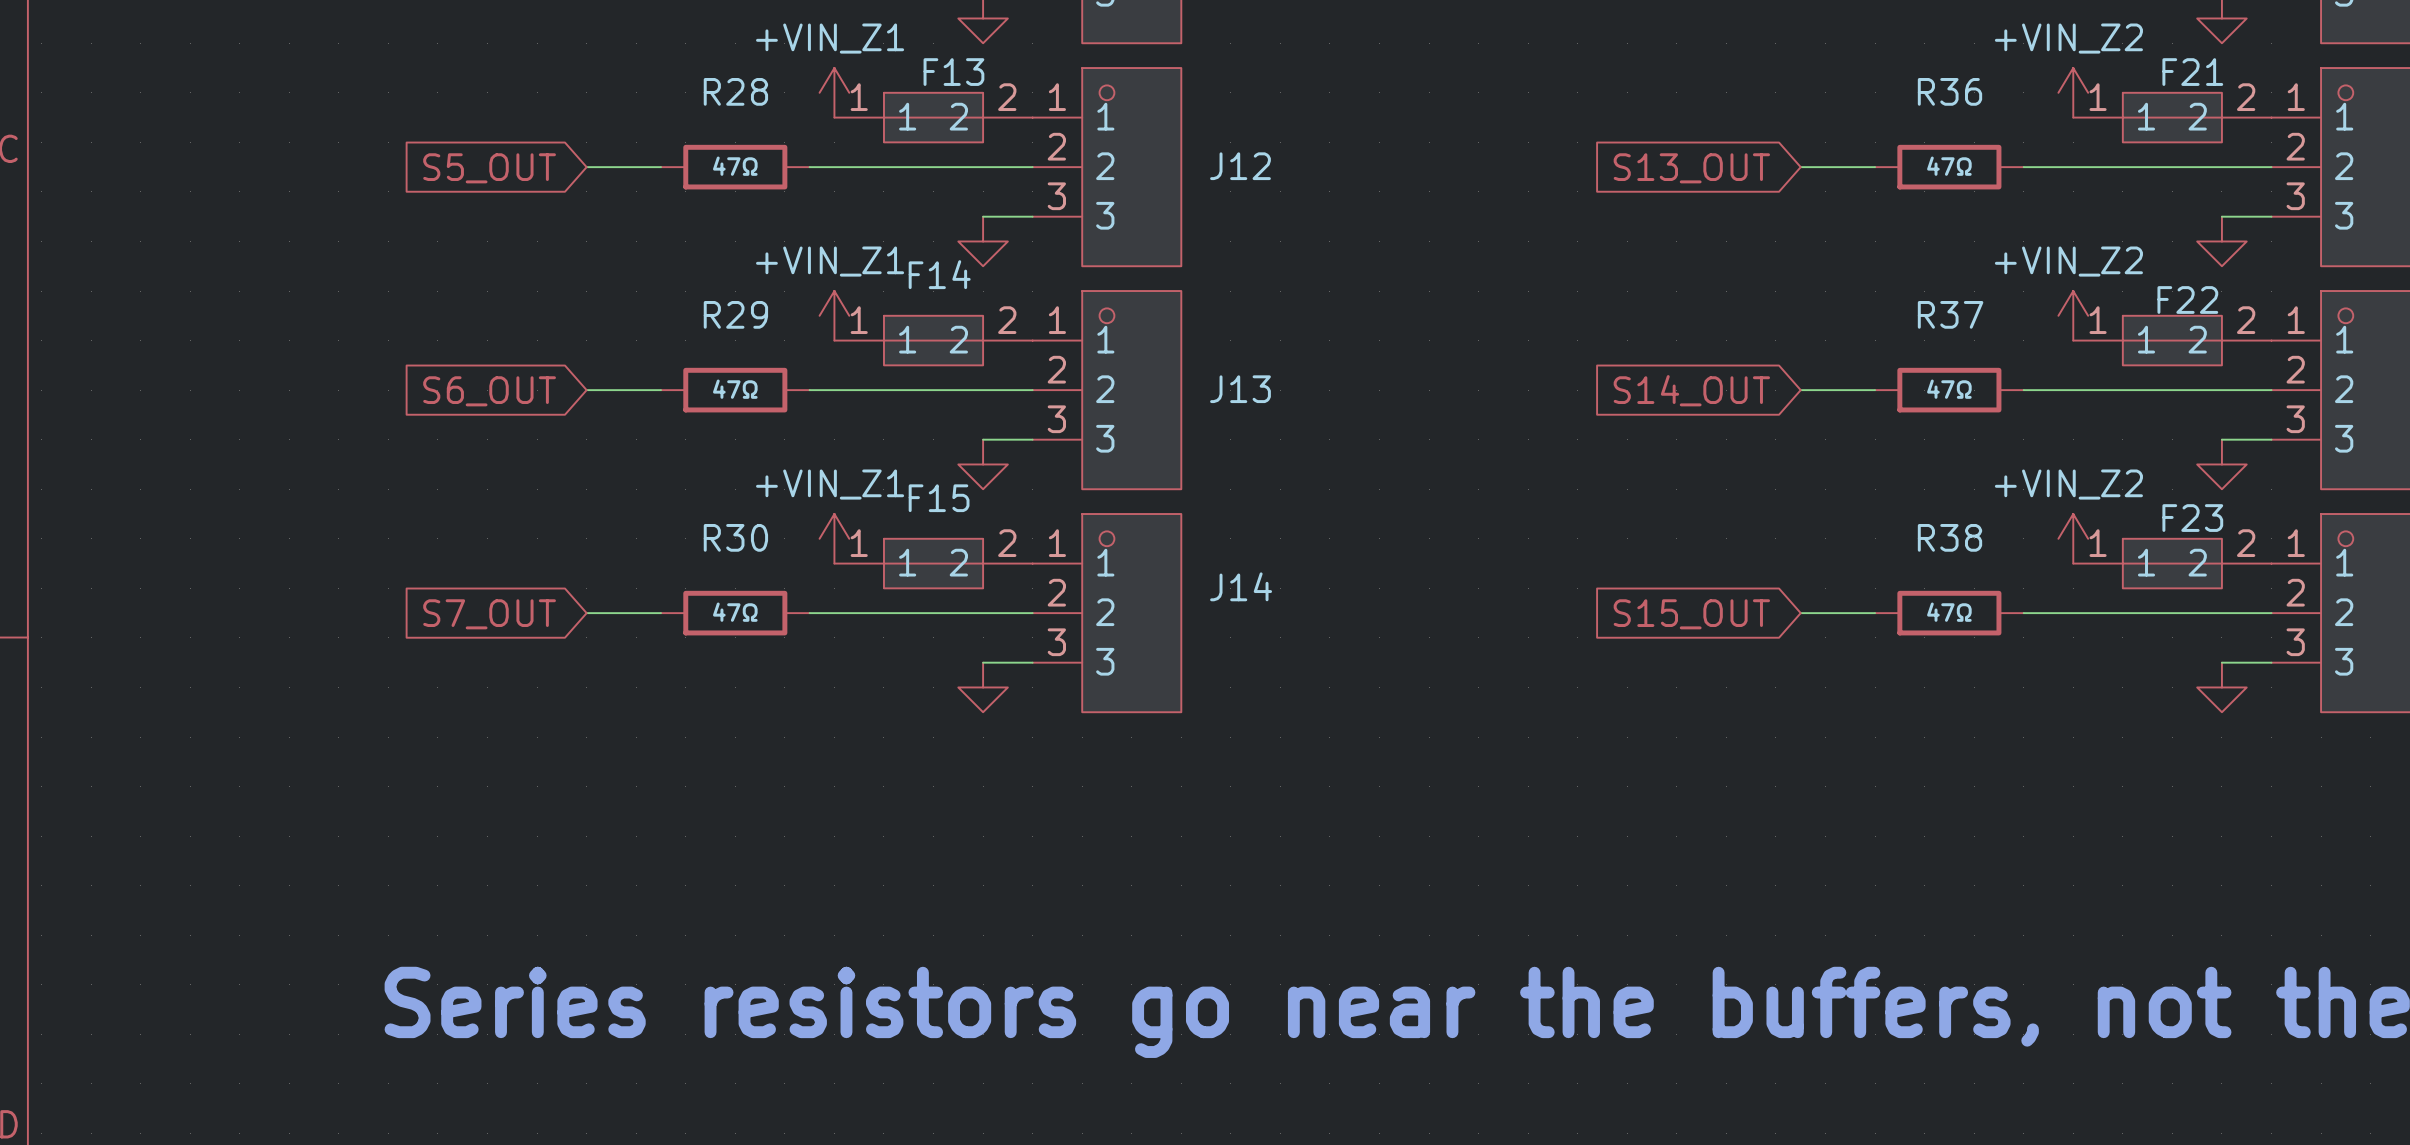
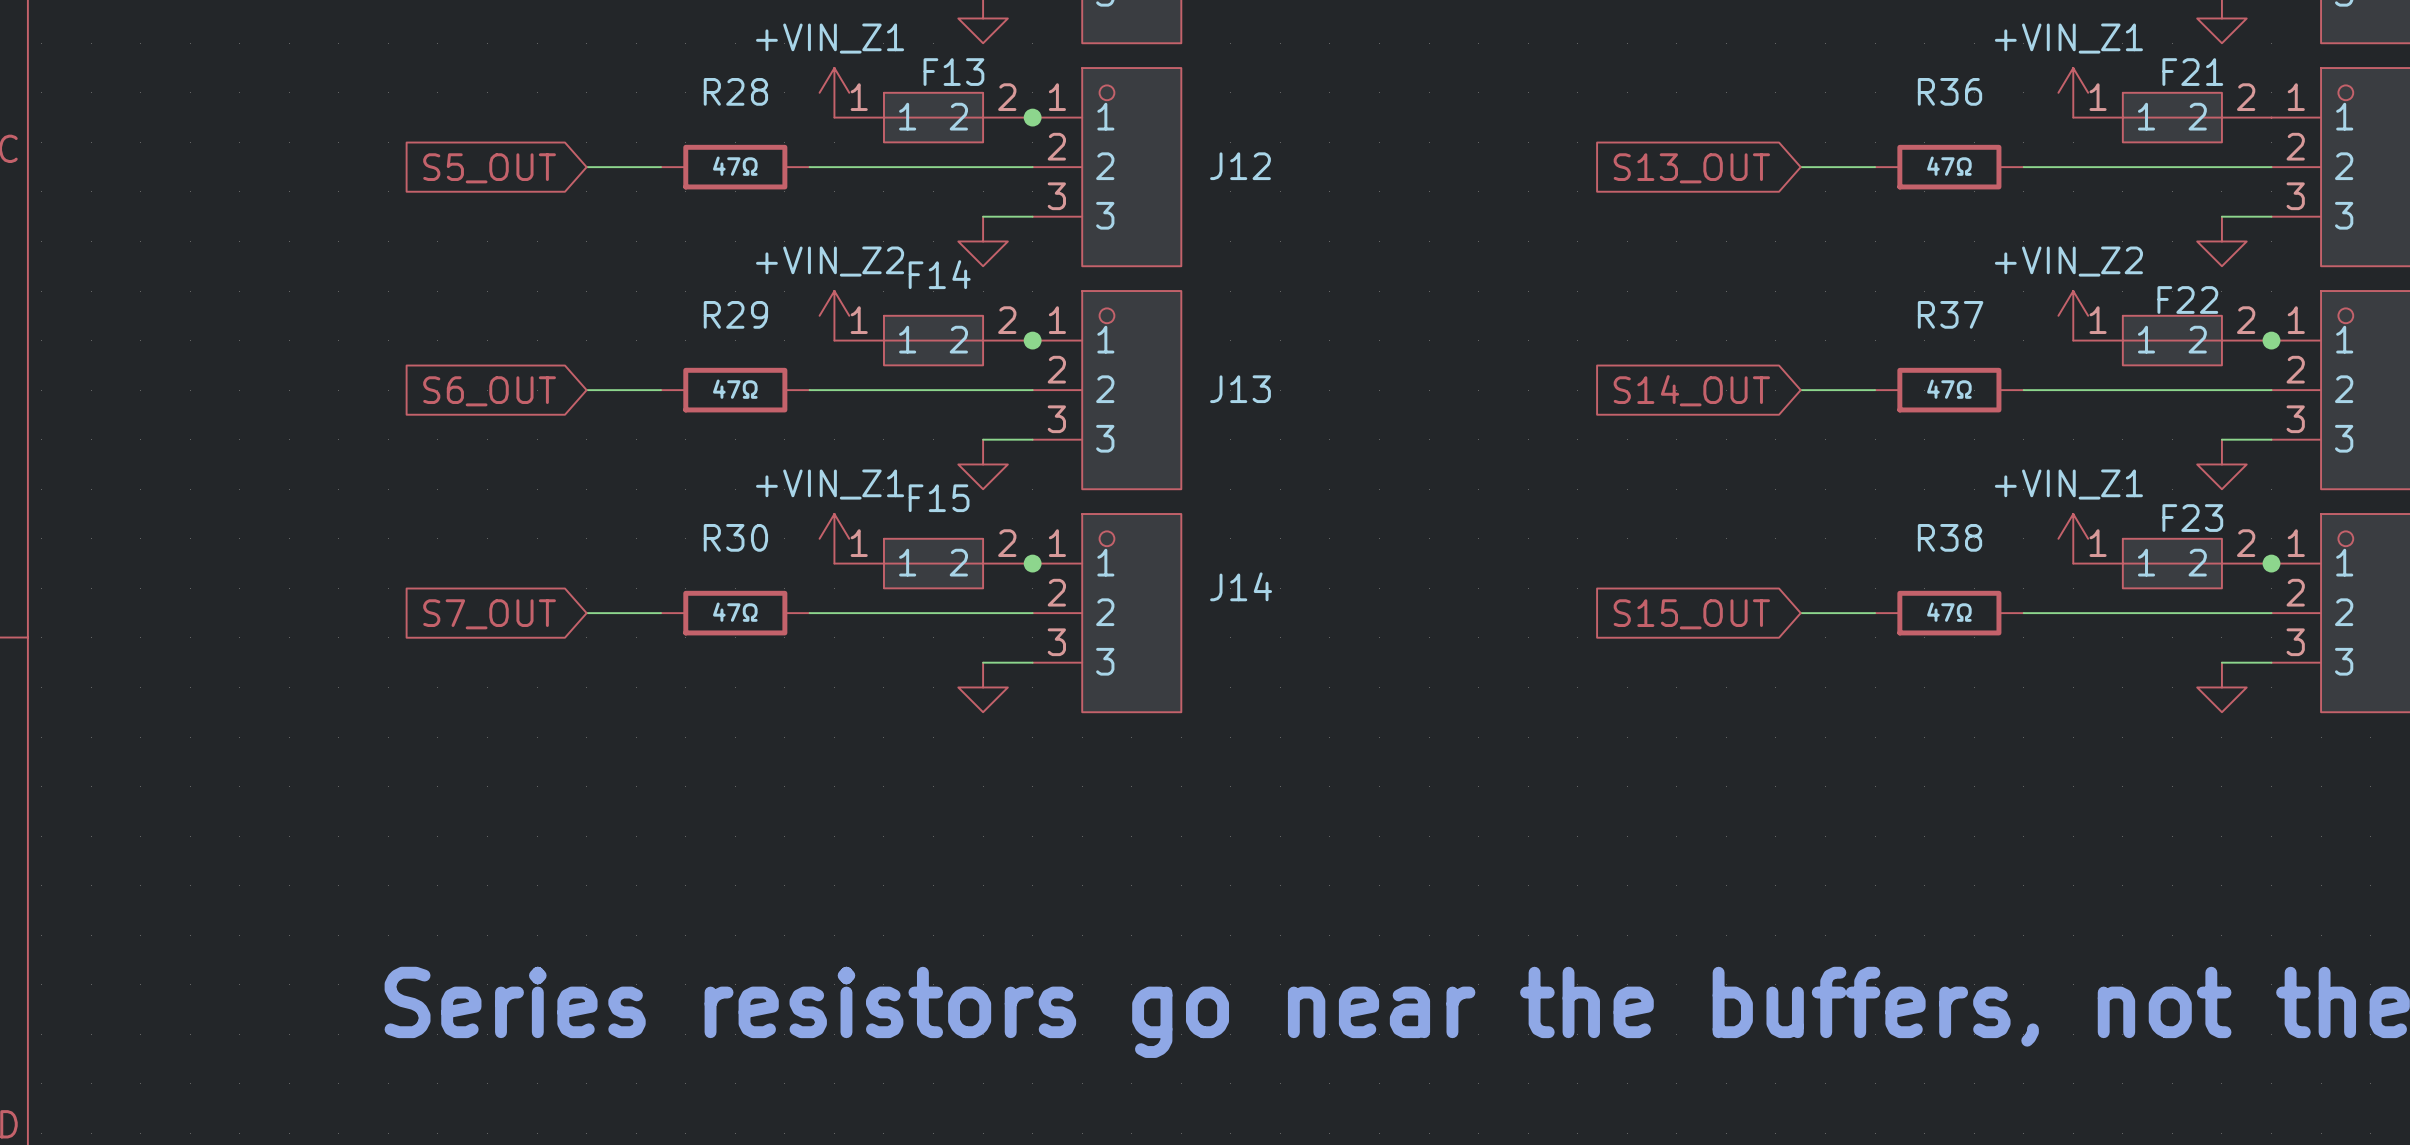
power symbol: +VIN_Z2 (2073, 92) -> +VIN_Z1 (2073, 92)
junction: none -> (1032, 117)
power symbol: +VIN_Z1 (834, 315) -> +VIN_Z2 (834, 315)
junction: none -> (1032, 340)
junction: none -> (2271, 340)
power symbol: +VIN_Z2 (2073, 538) -> +VIN_Z1 (2073, 538)
junction: none -> (1032, 563)
junction: none -> (2271, 563)

